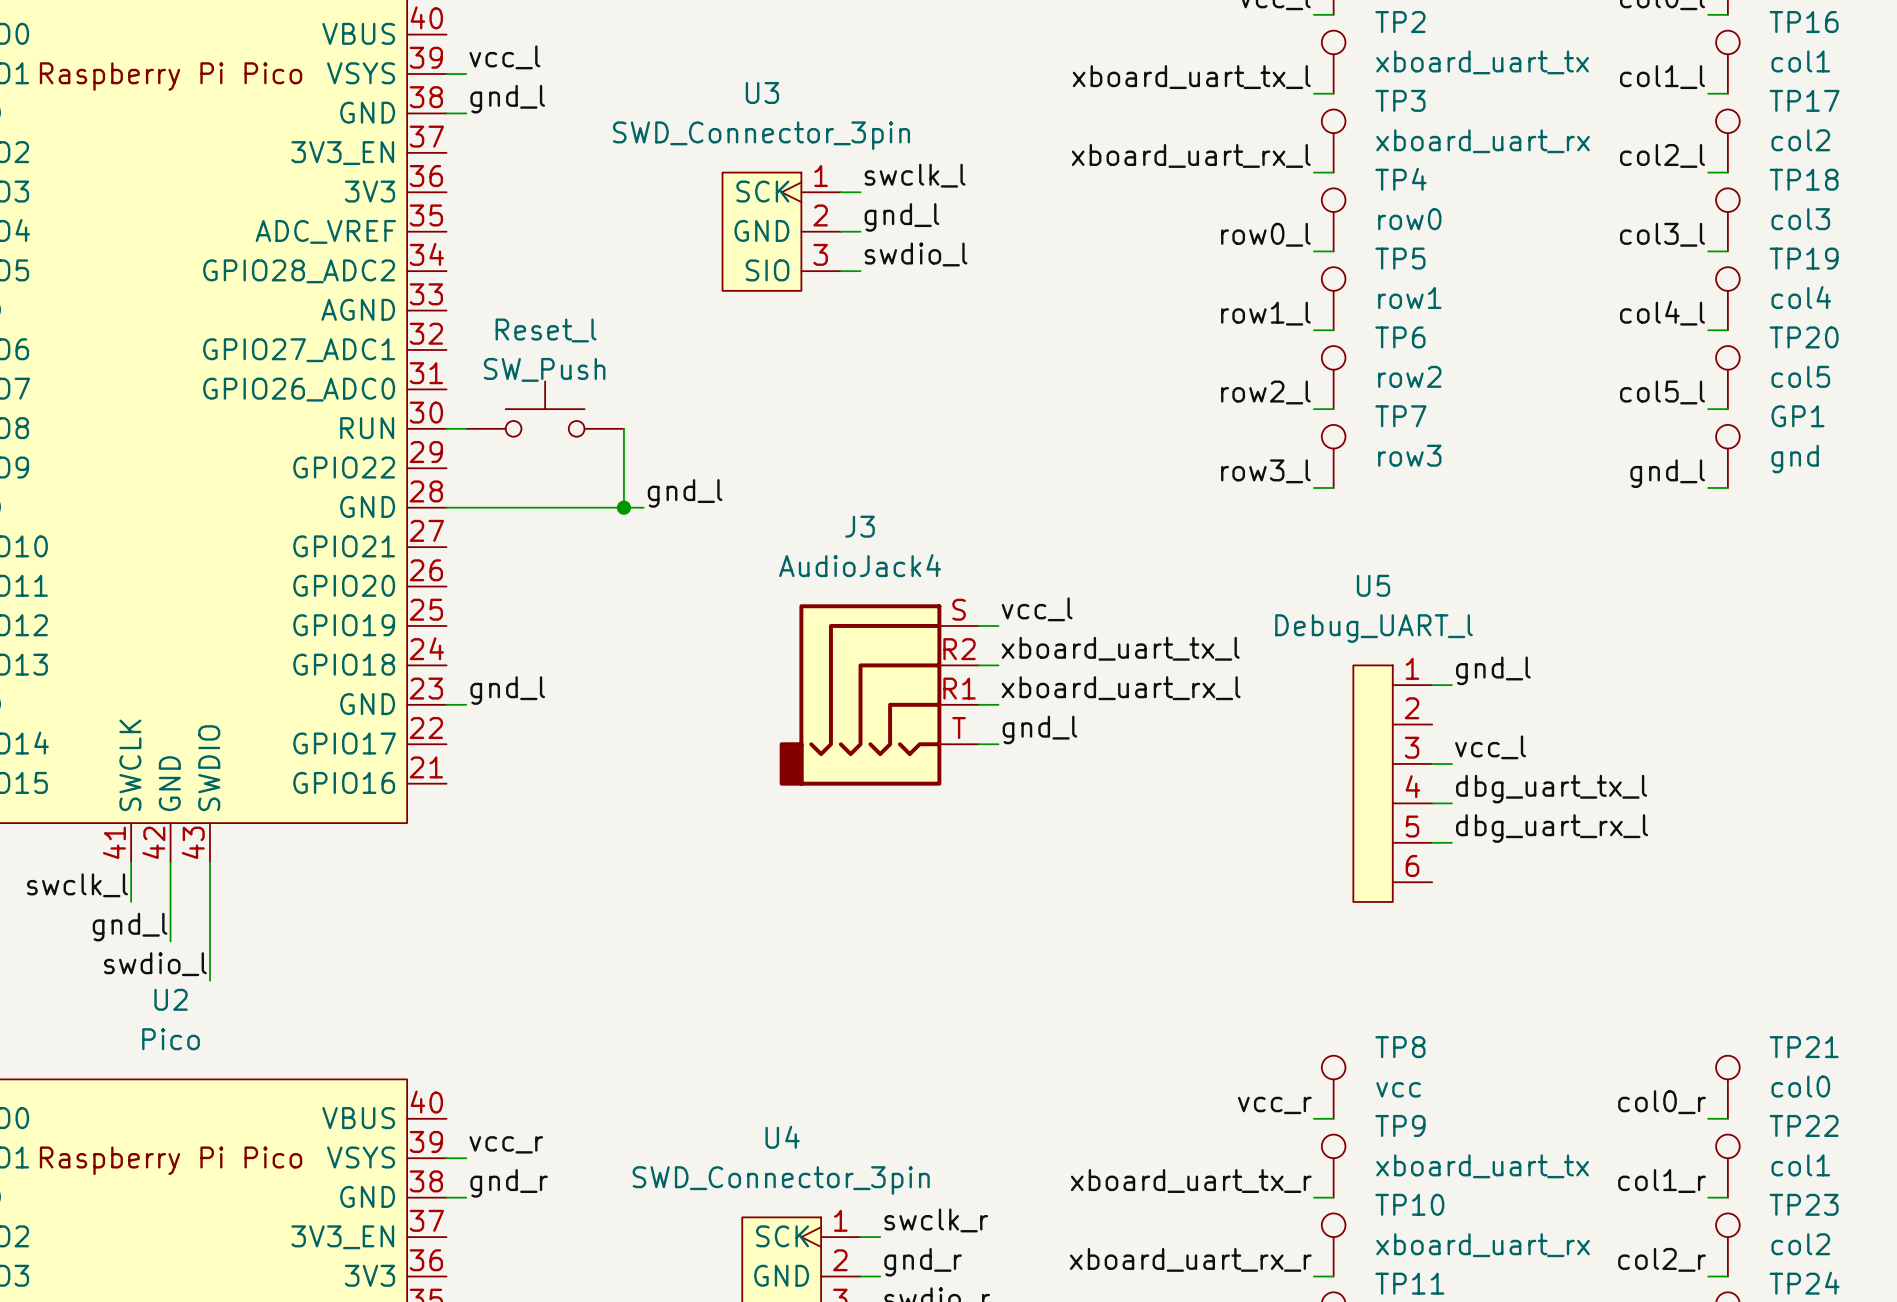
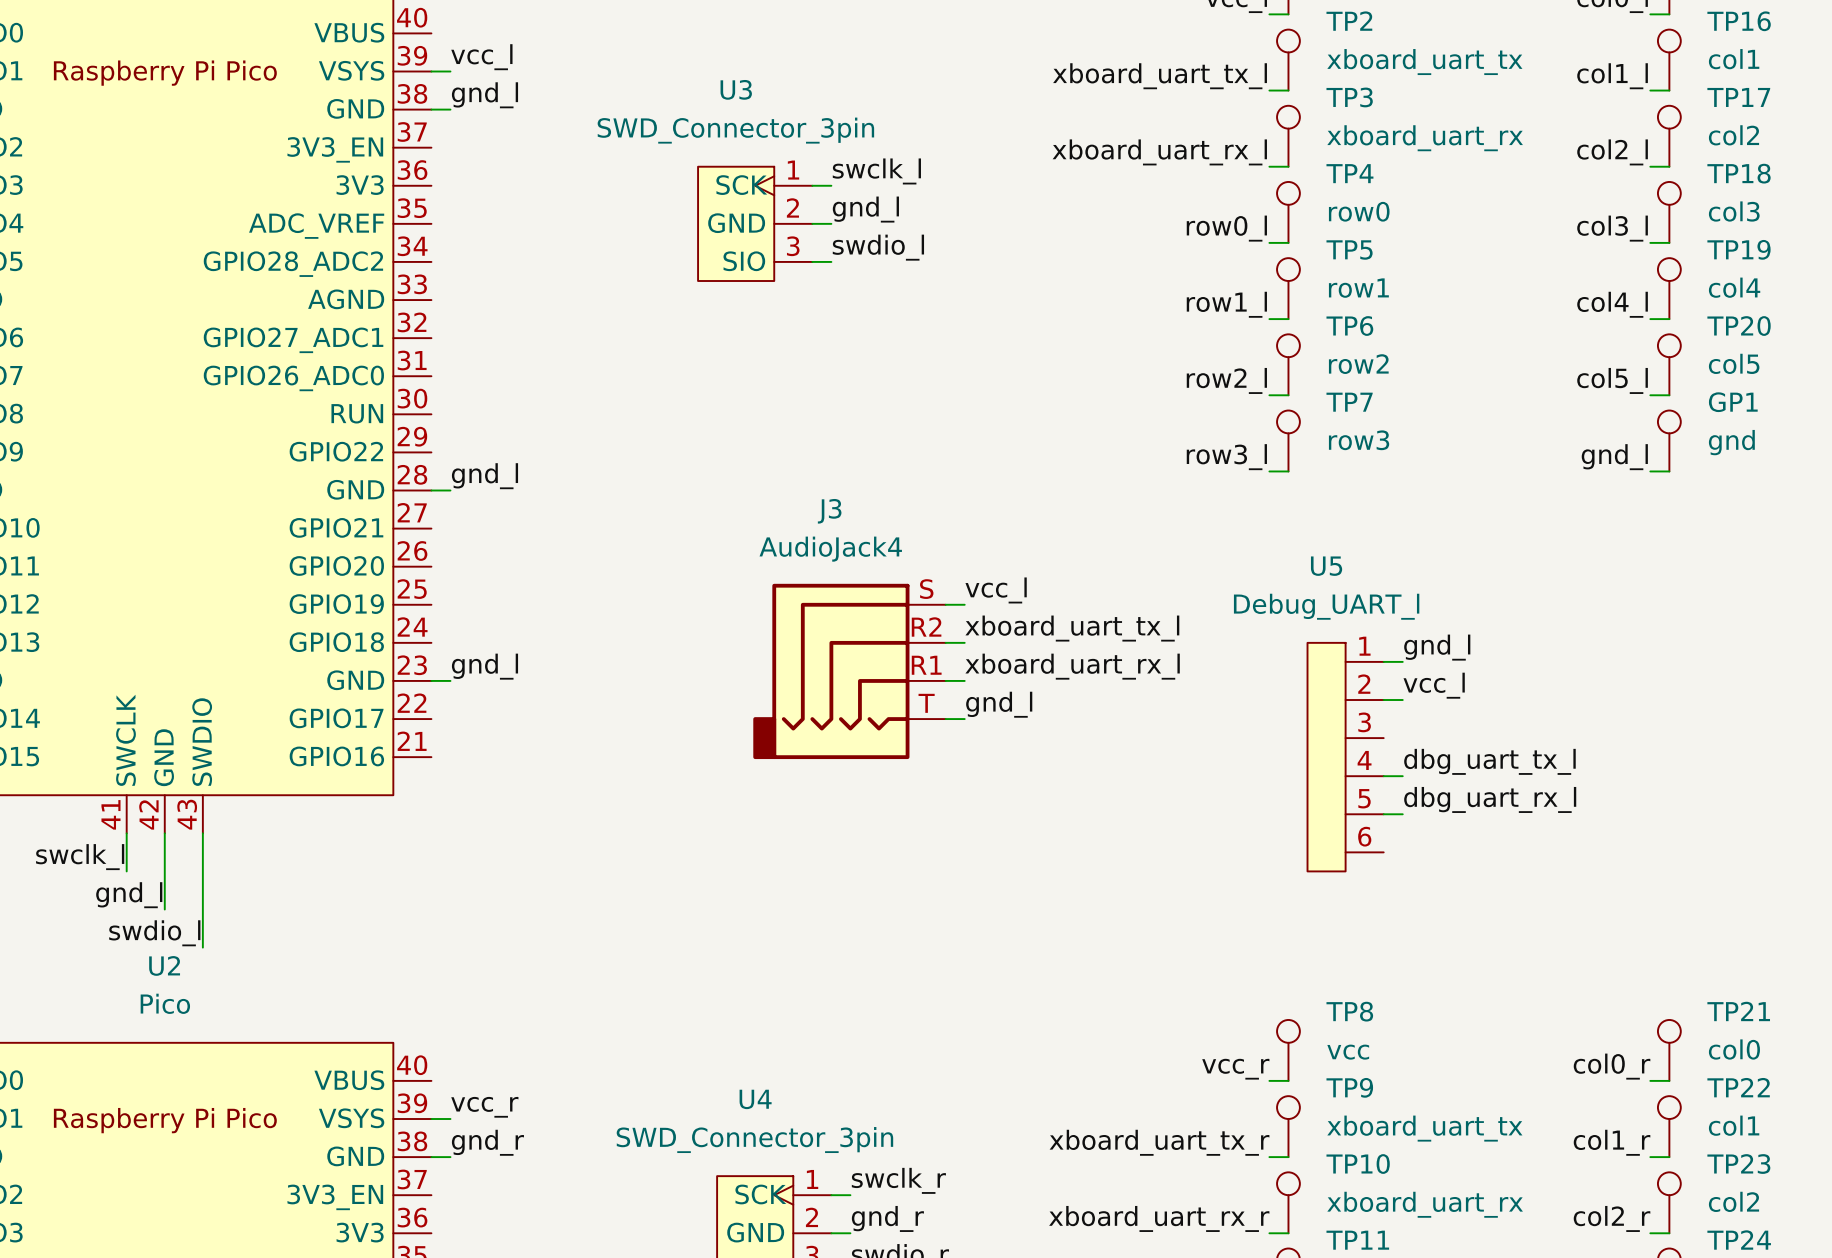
Reset_l: SW_Push (545, 409) -> none
wire: (446, 428) (466, 428) -> none
wire: (623, 428) (623, 507) -> none
label position: gnd_l (685, 493) -> gnd_l (484, 476)
wire: (466, 507) (643, 507) -> none
junction: (623, 507) -> none
label position: vcc_l (1490, 747) -> vcc_l (1434, 685)
wire: (1432, 763) (1451, 763) -> (1383, 700) (1402, 700)

